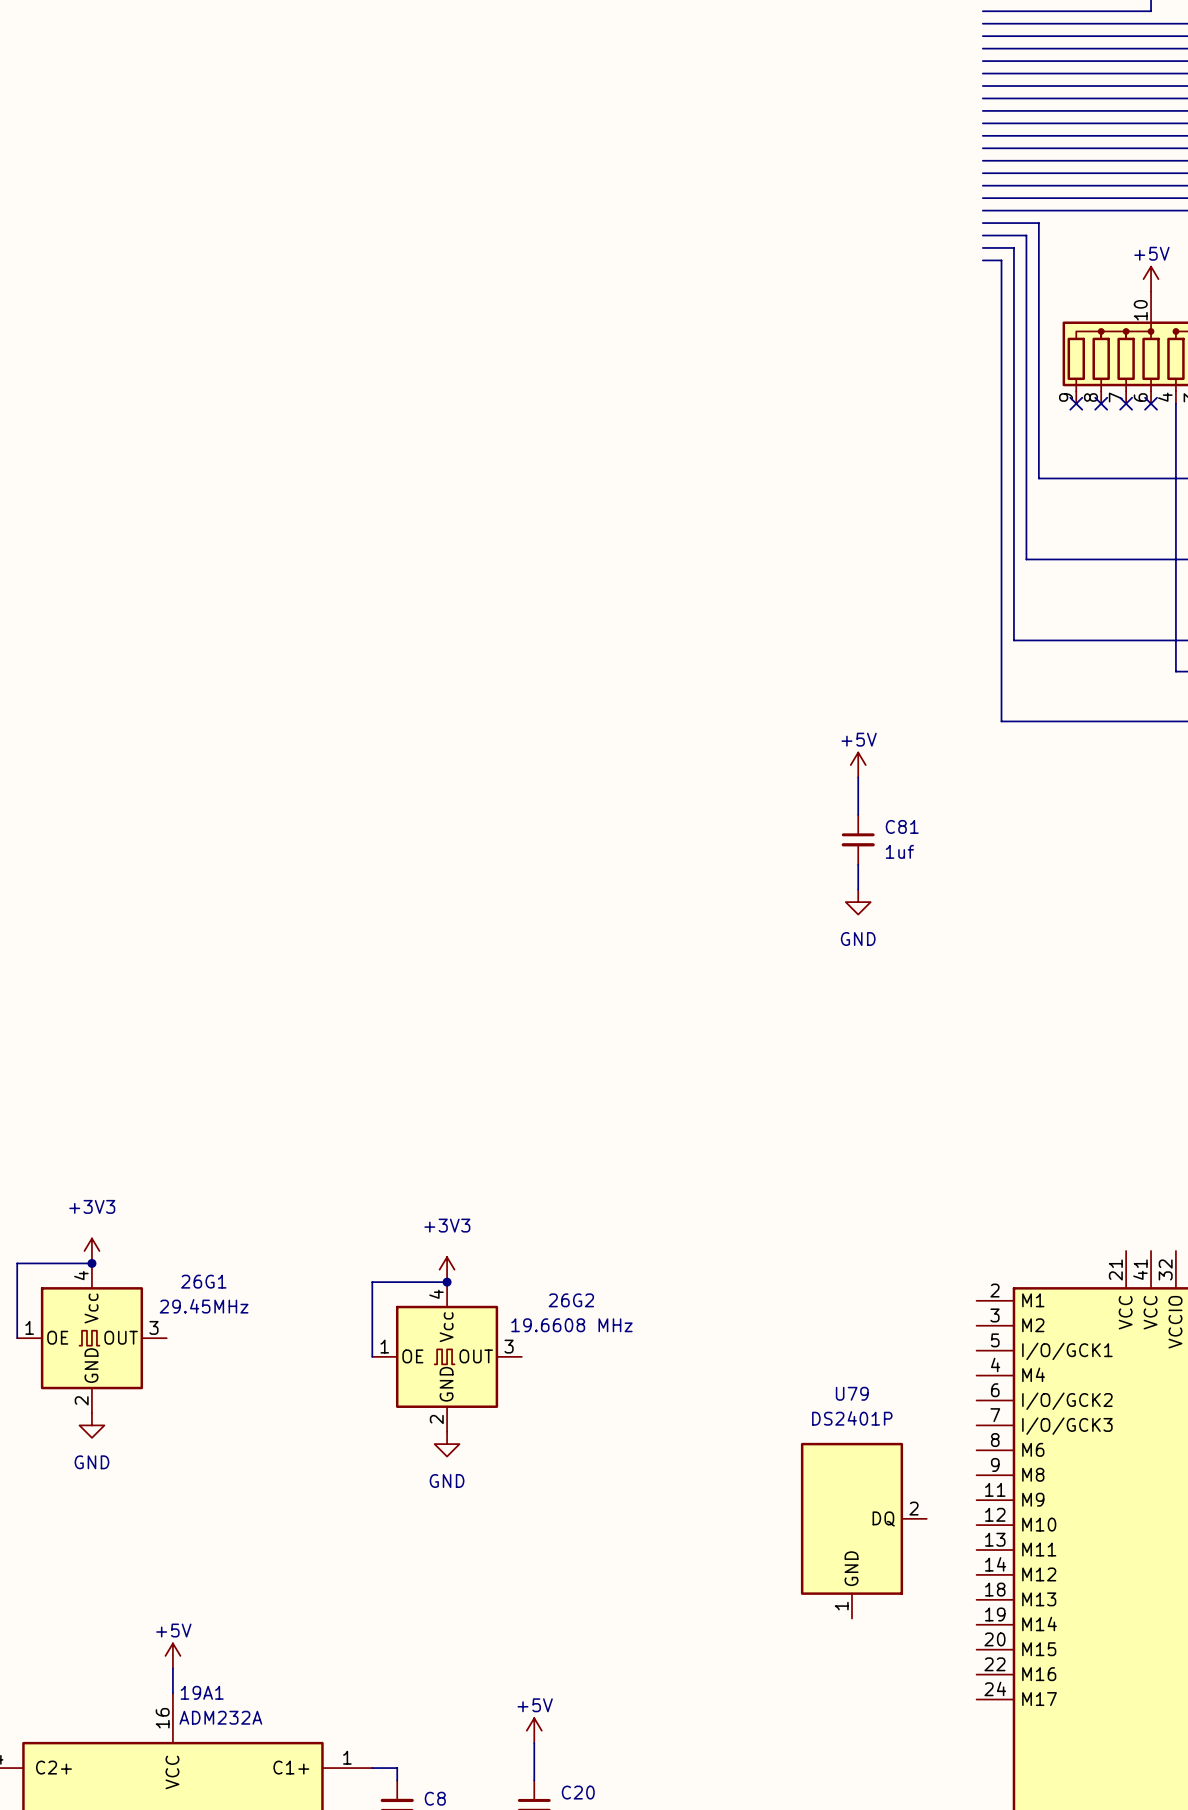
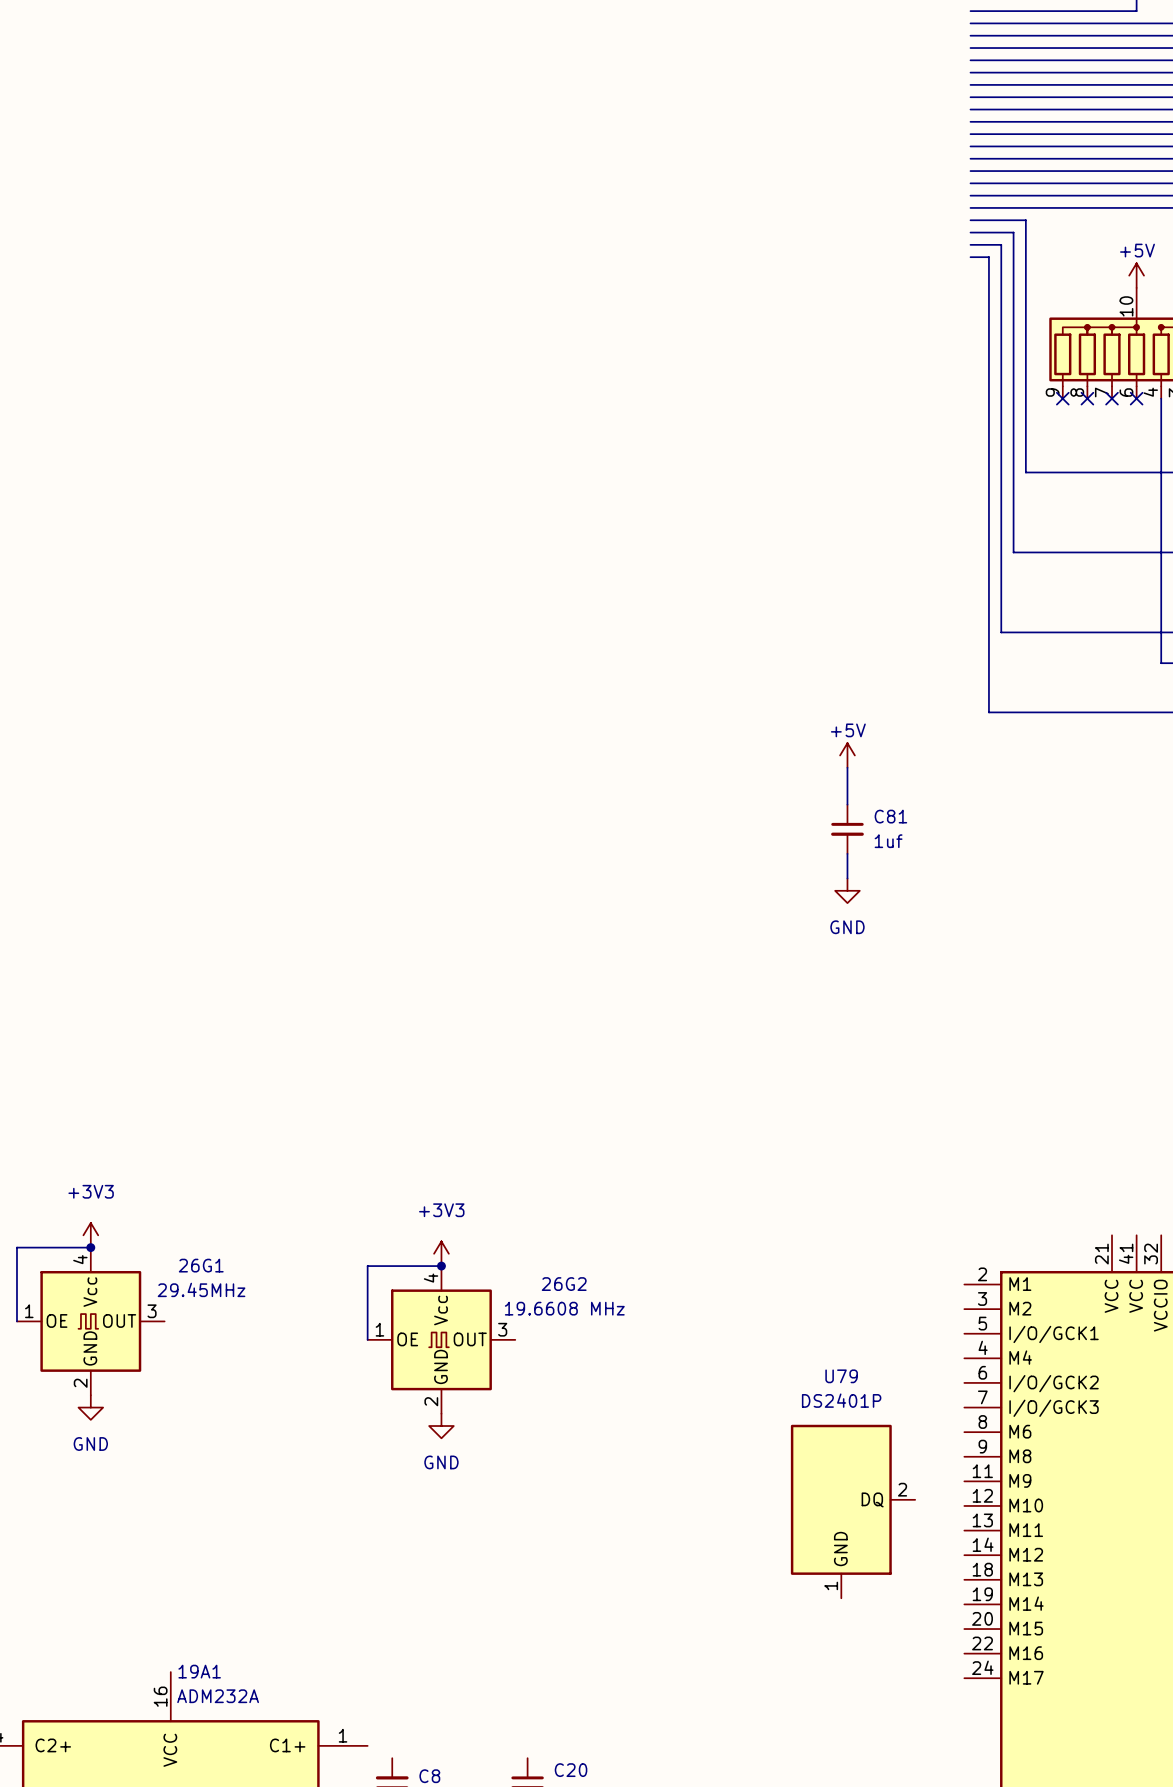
power symbol: +5V (172, 1655) -> none
wire: (172, 1668) (172, 1693) -> none
power symbol: +5V (534, 1730) -> none
wire: (534, 1743) (534, 1780) -> none
wire: (372, 1768) (397, 1768) (397, 1780) -> none

